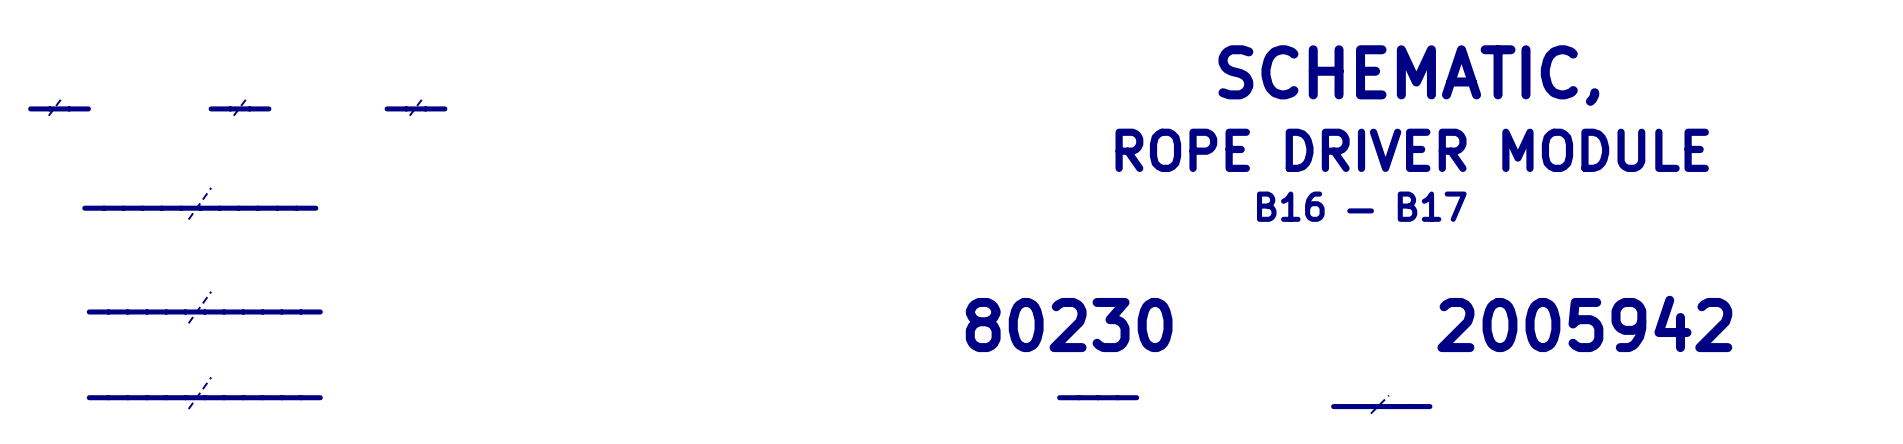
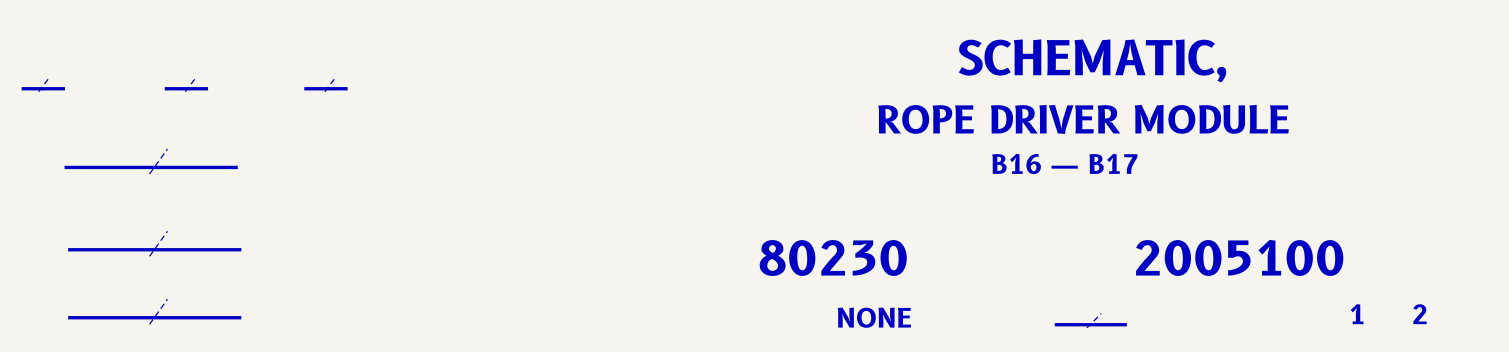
text: 2005942 (1584, 323) -> 2005100 (1239, 257)
text: none -> 1 2 (1388, 314)
text: ____ (1098, 397) -> none
text: none -> NONE (874, 317)

